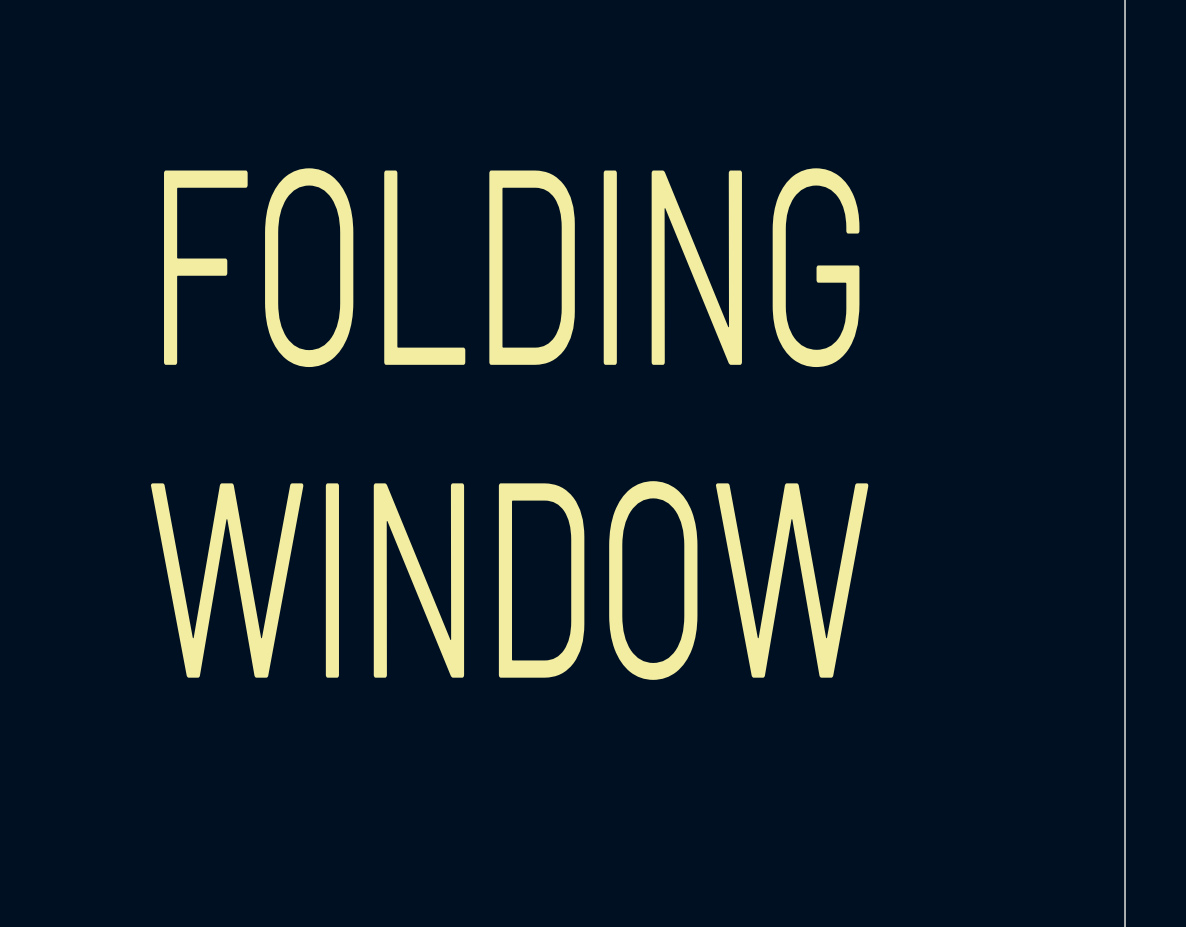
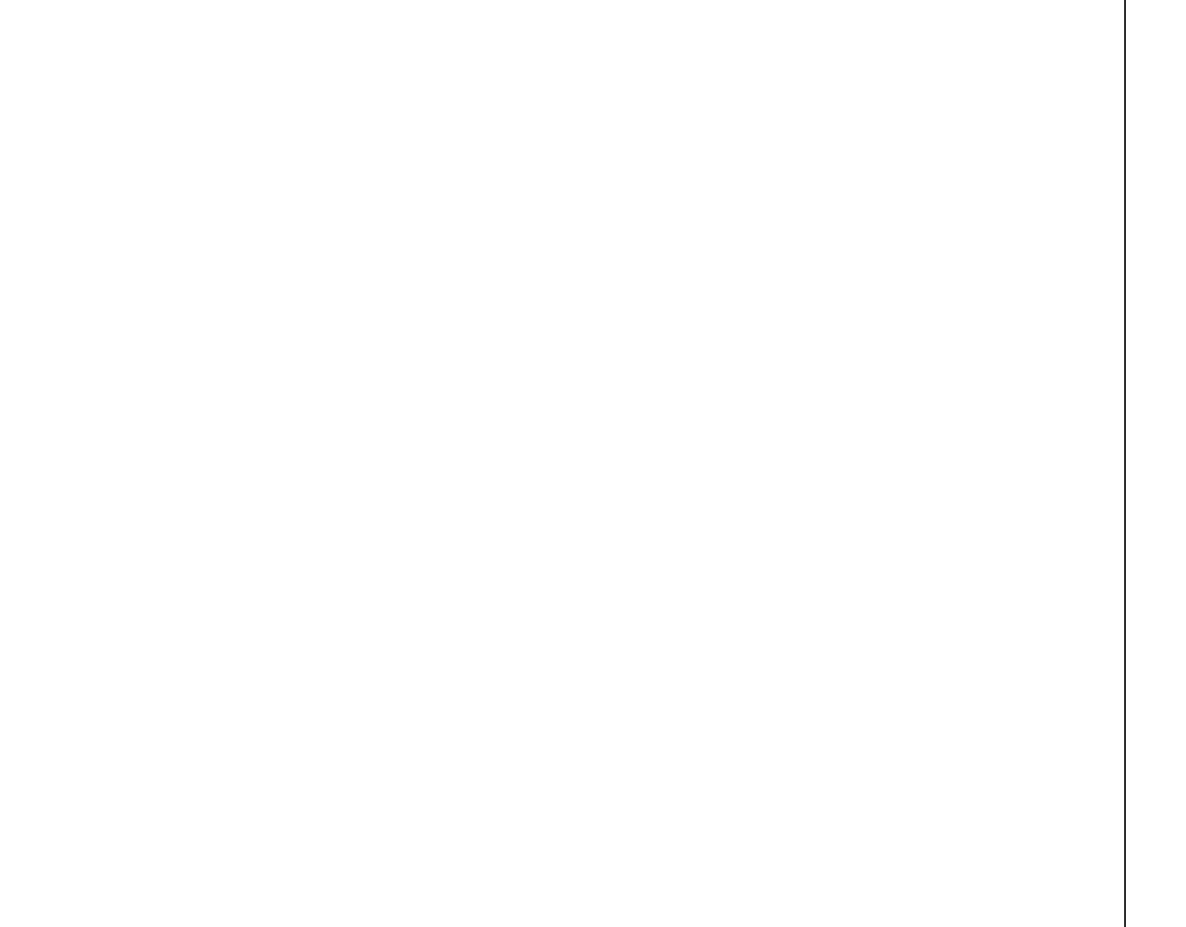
text: FOLDING (511, 267) -> none
text: WINDOW (509, 580) -> none

